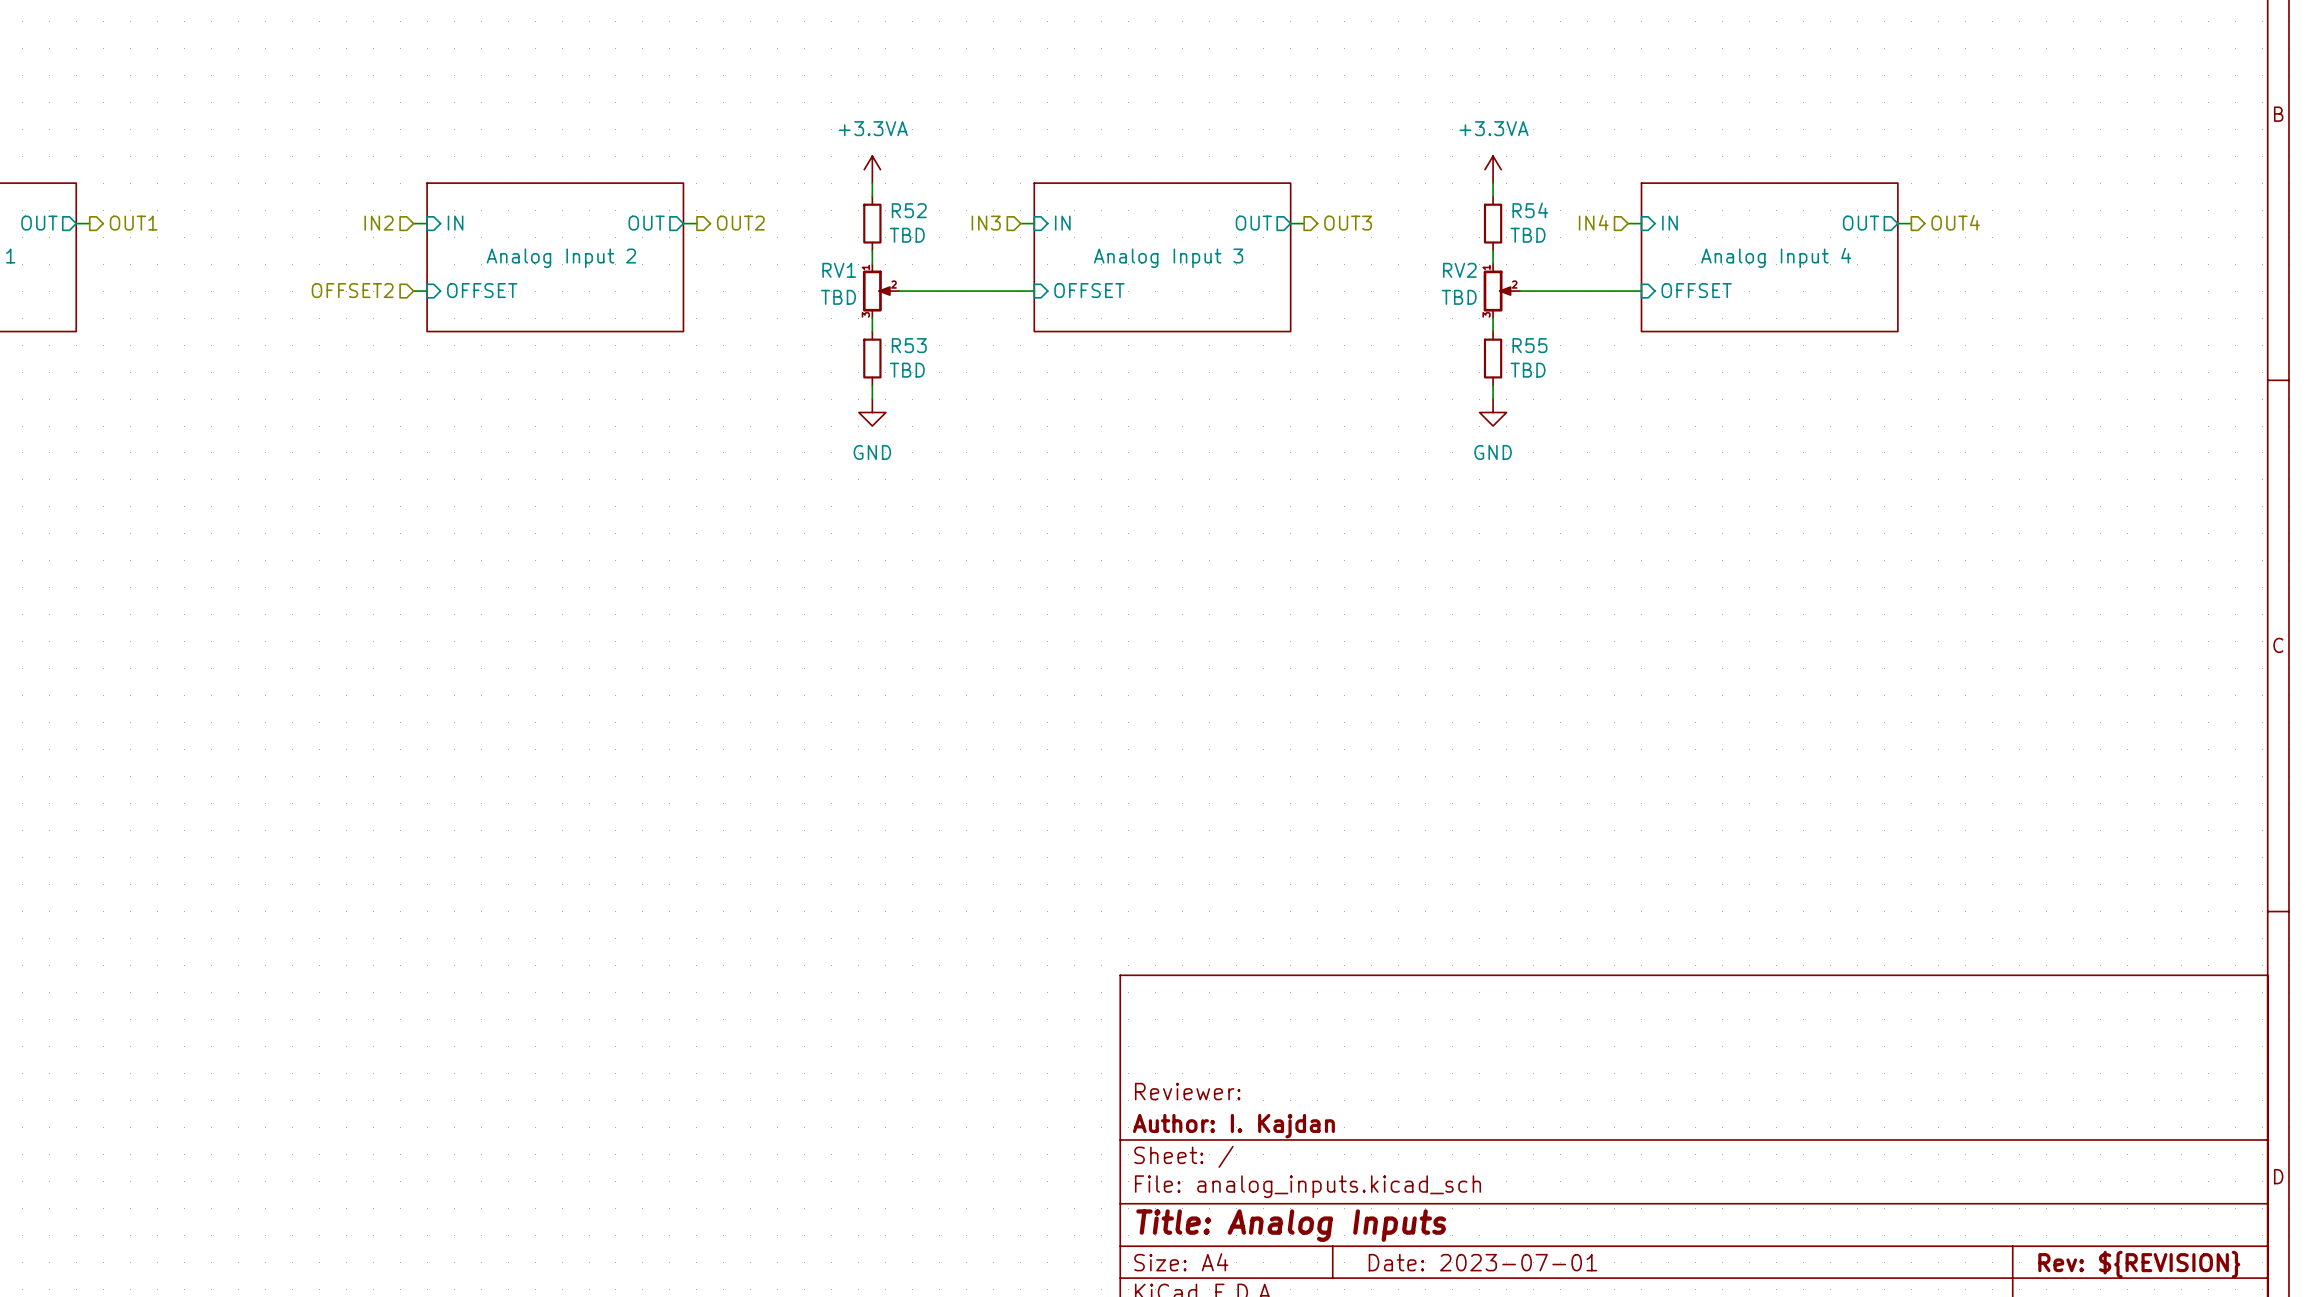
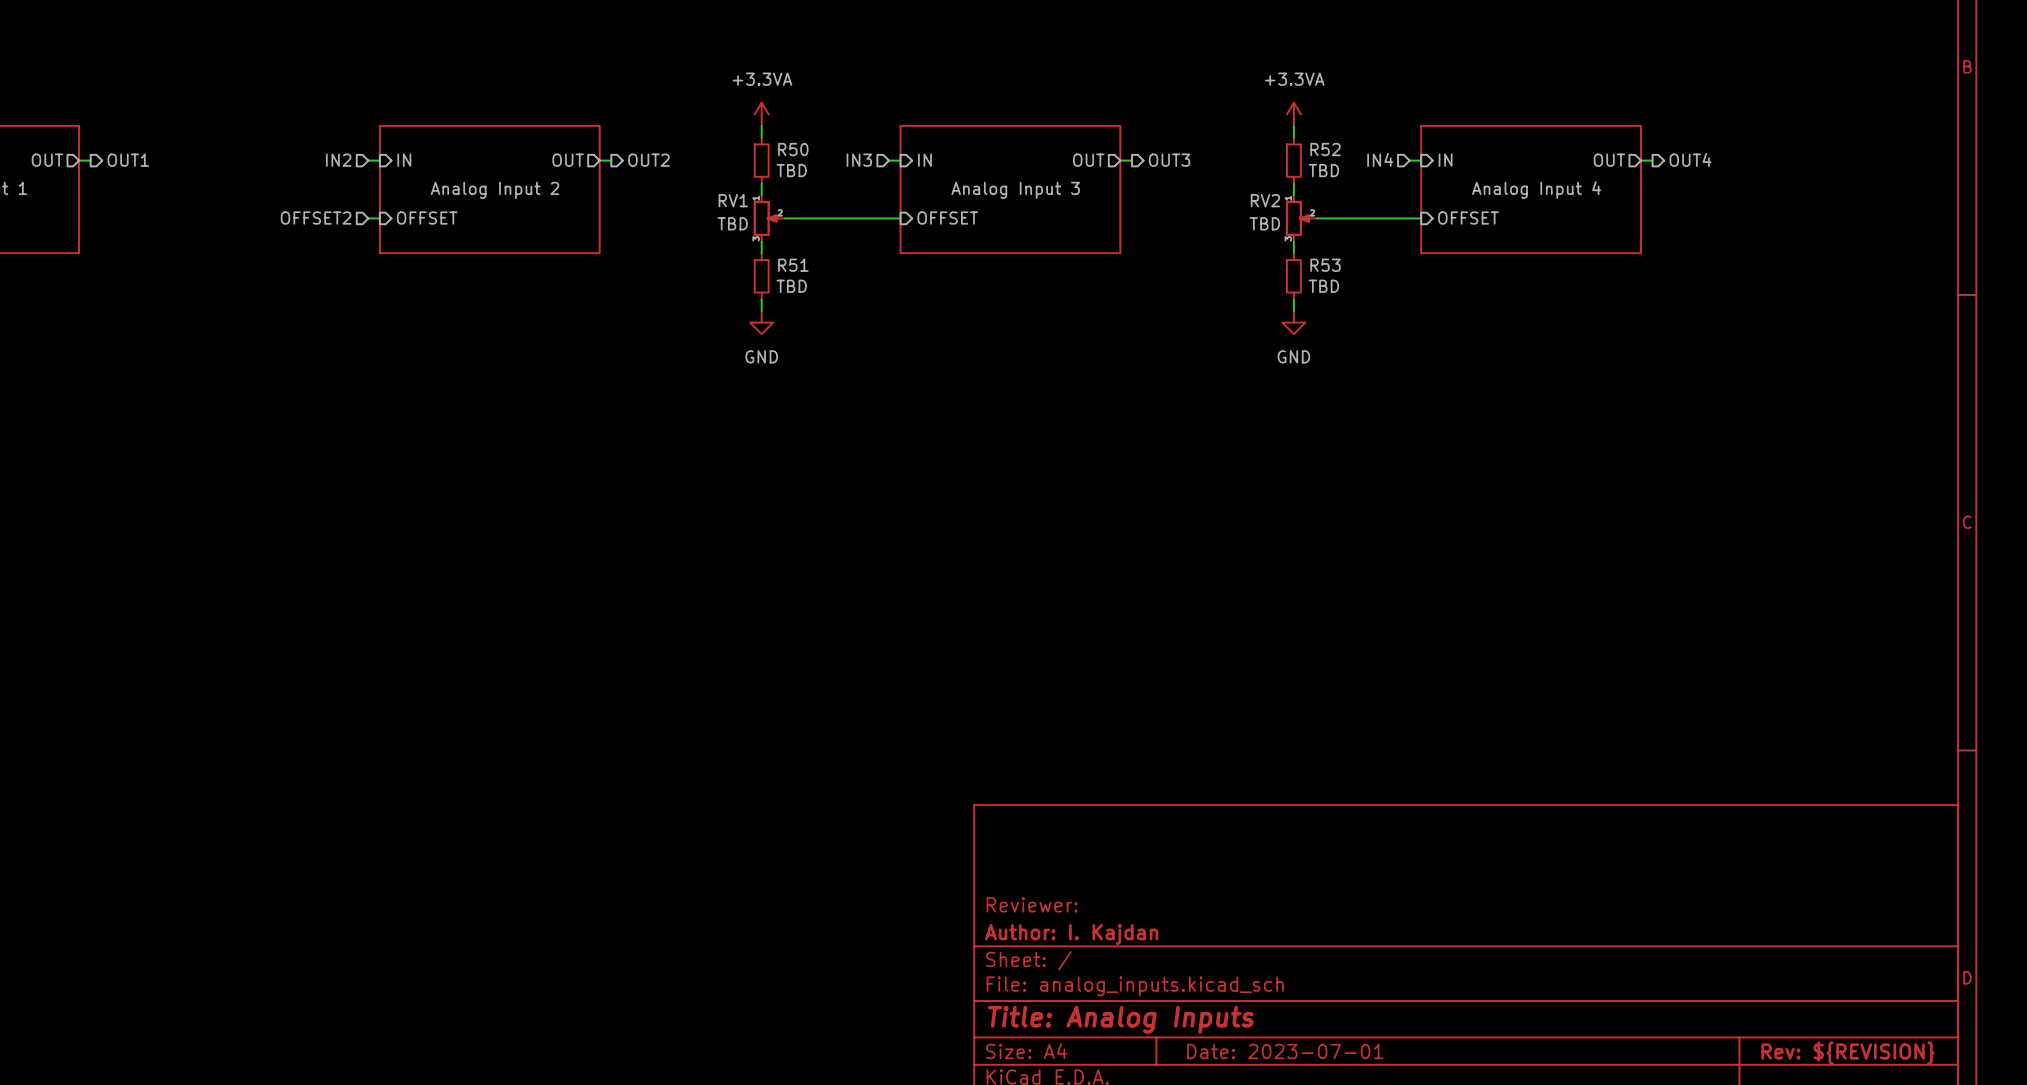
R52 name: R52 (909, 210) -> R50 (793, 149)
R54 name: R54 (1530, 210) -> R52 (1325, 149)
R53 name: R53 (909, 345) -> R51 (793, 265)
R55 name: R55 (1529, 345) -> R53 (1325, 265)

